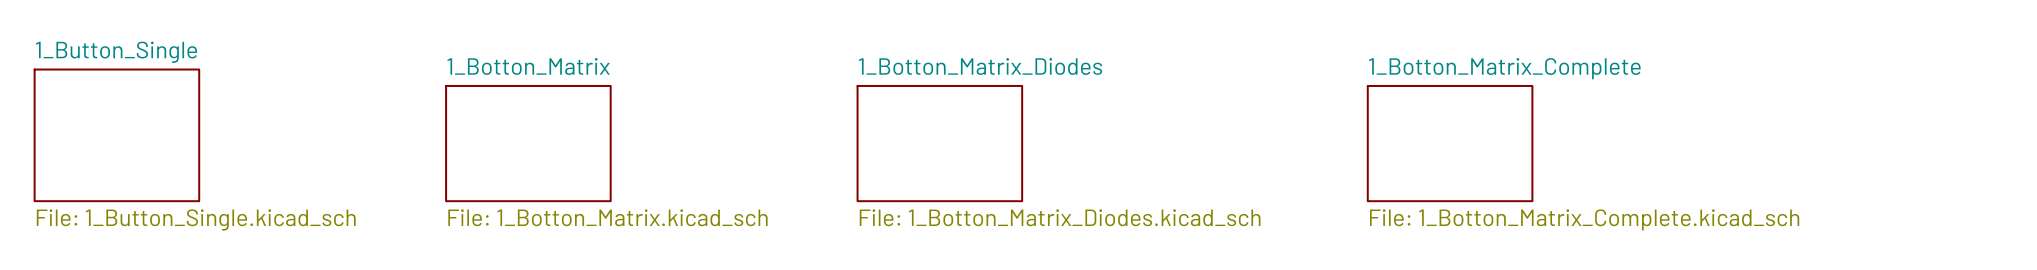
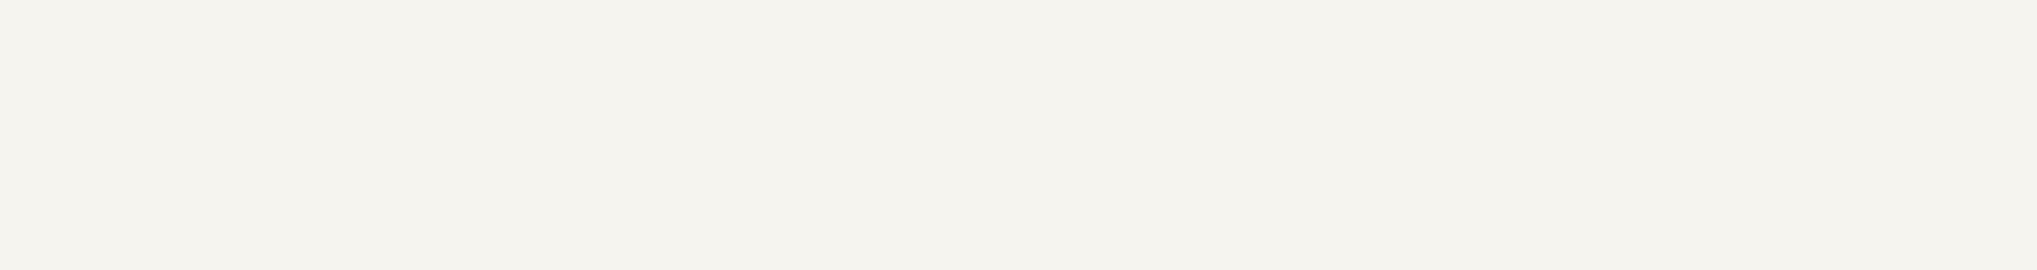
sheet 1_Button_Single: File: 1_Button_Single.kicad_sch (116, 135) -> none
sheet 1_Botton_Matrix: File: 1_Botton_Matrix.kicad_sch (528, 143) -> none
sheet 1_Botton_Matrix_Diodes: File: 1_Botton_Matrix_Diodes.kicad_sch (939, 143) -> none
sheet 1_Botton_Matrix_Complete: File: 1_Botton_Matrix_Complete.kicad_sch (1450, 143) -> none

